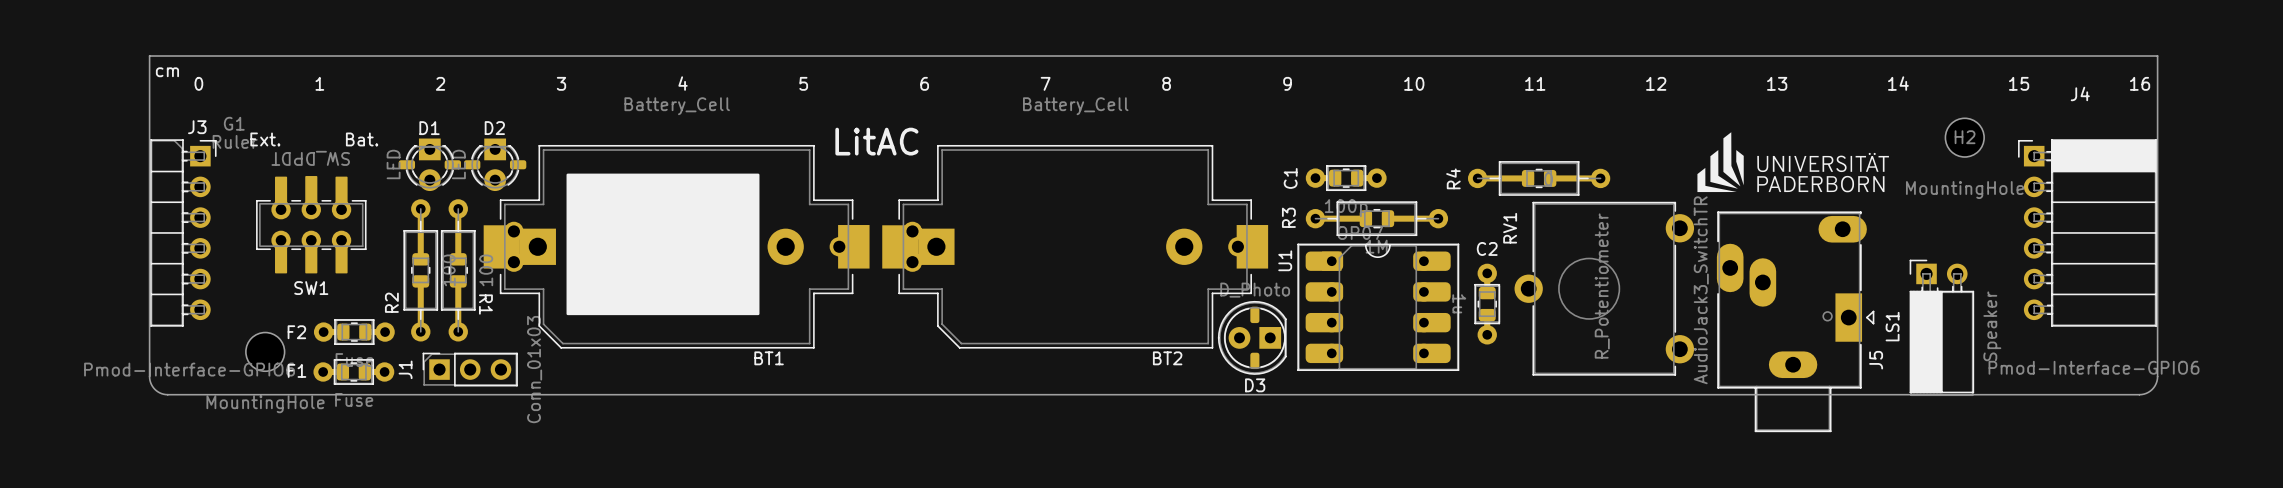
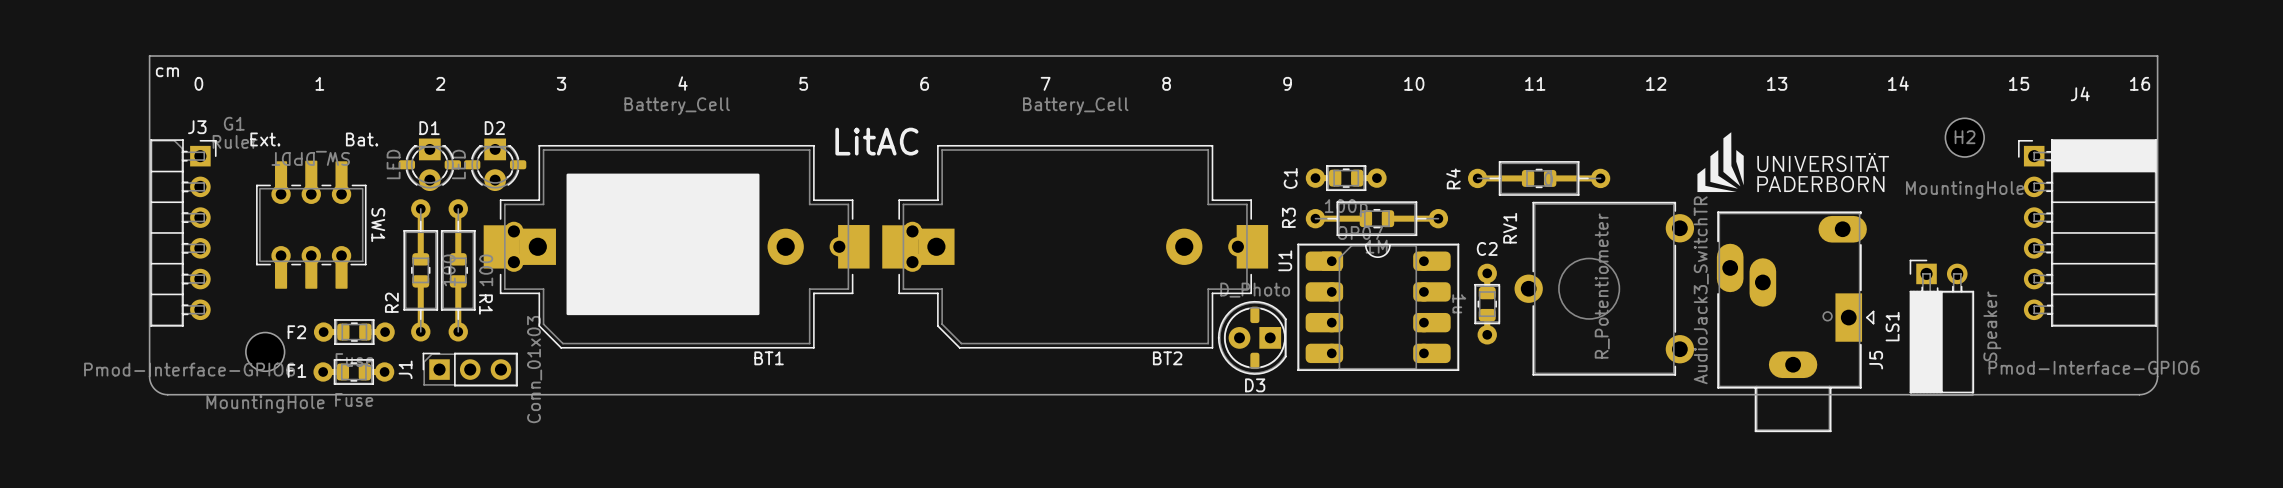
SW1 footprint: [256, 176, 367, 274] -> [256, 160, 367, 289]
SW1 name position: SW1 (311, 288) -> SW1 (378, 225)

